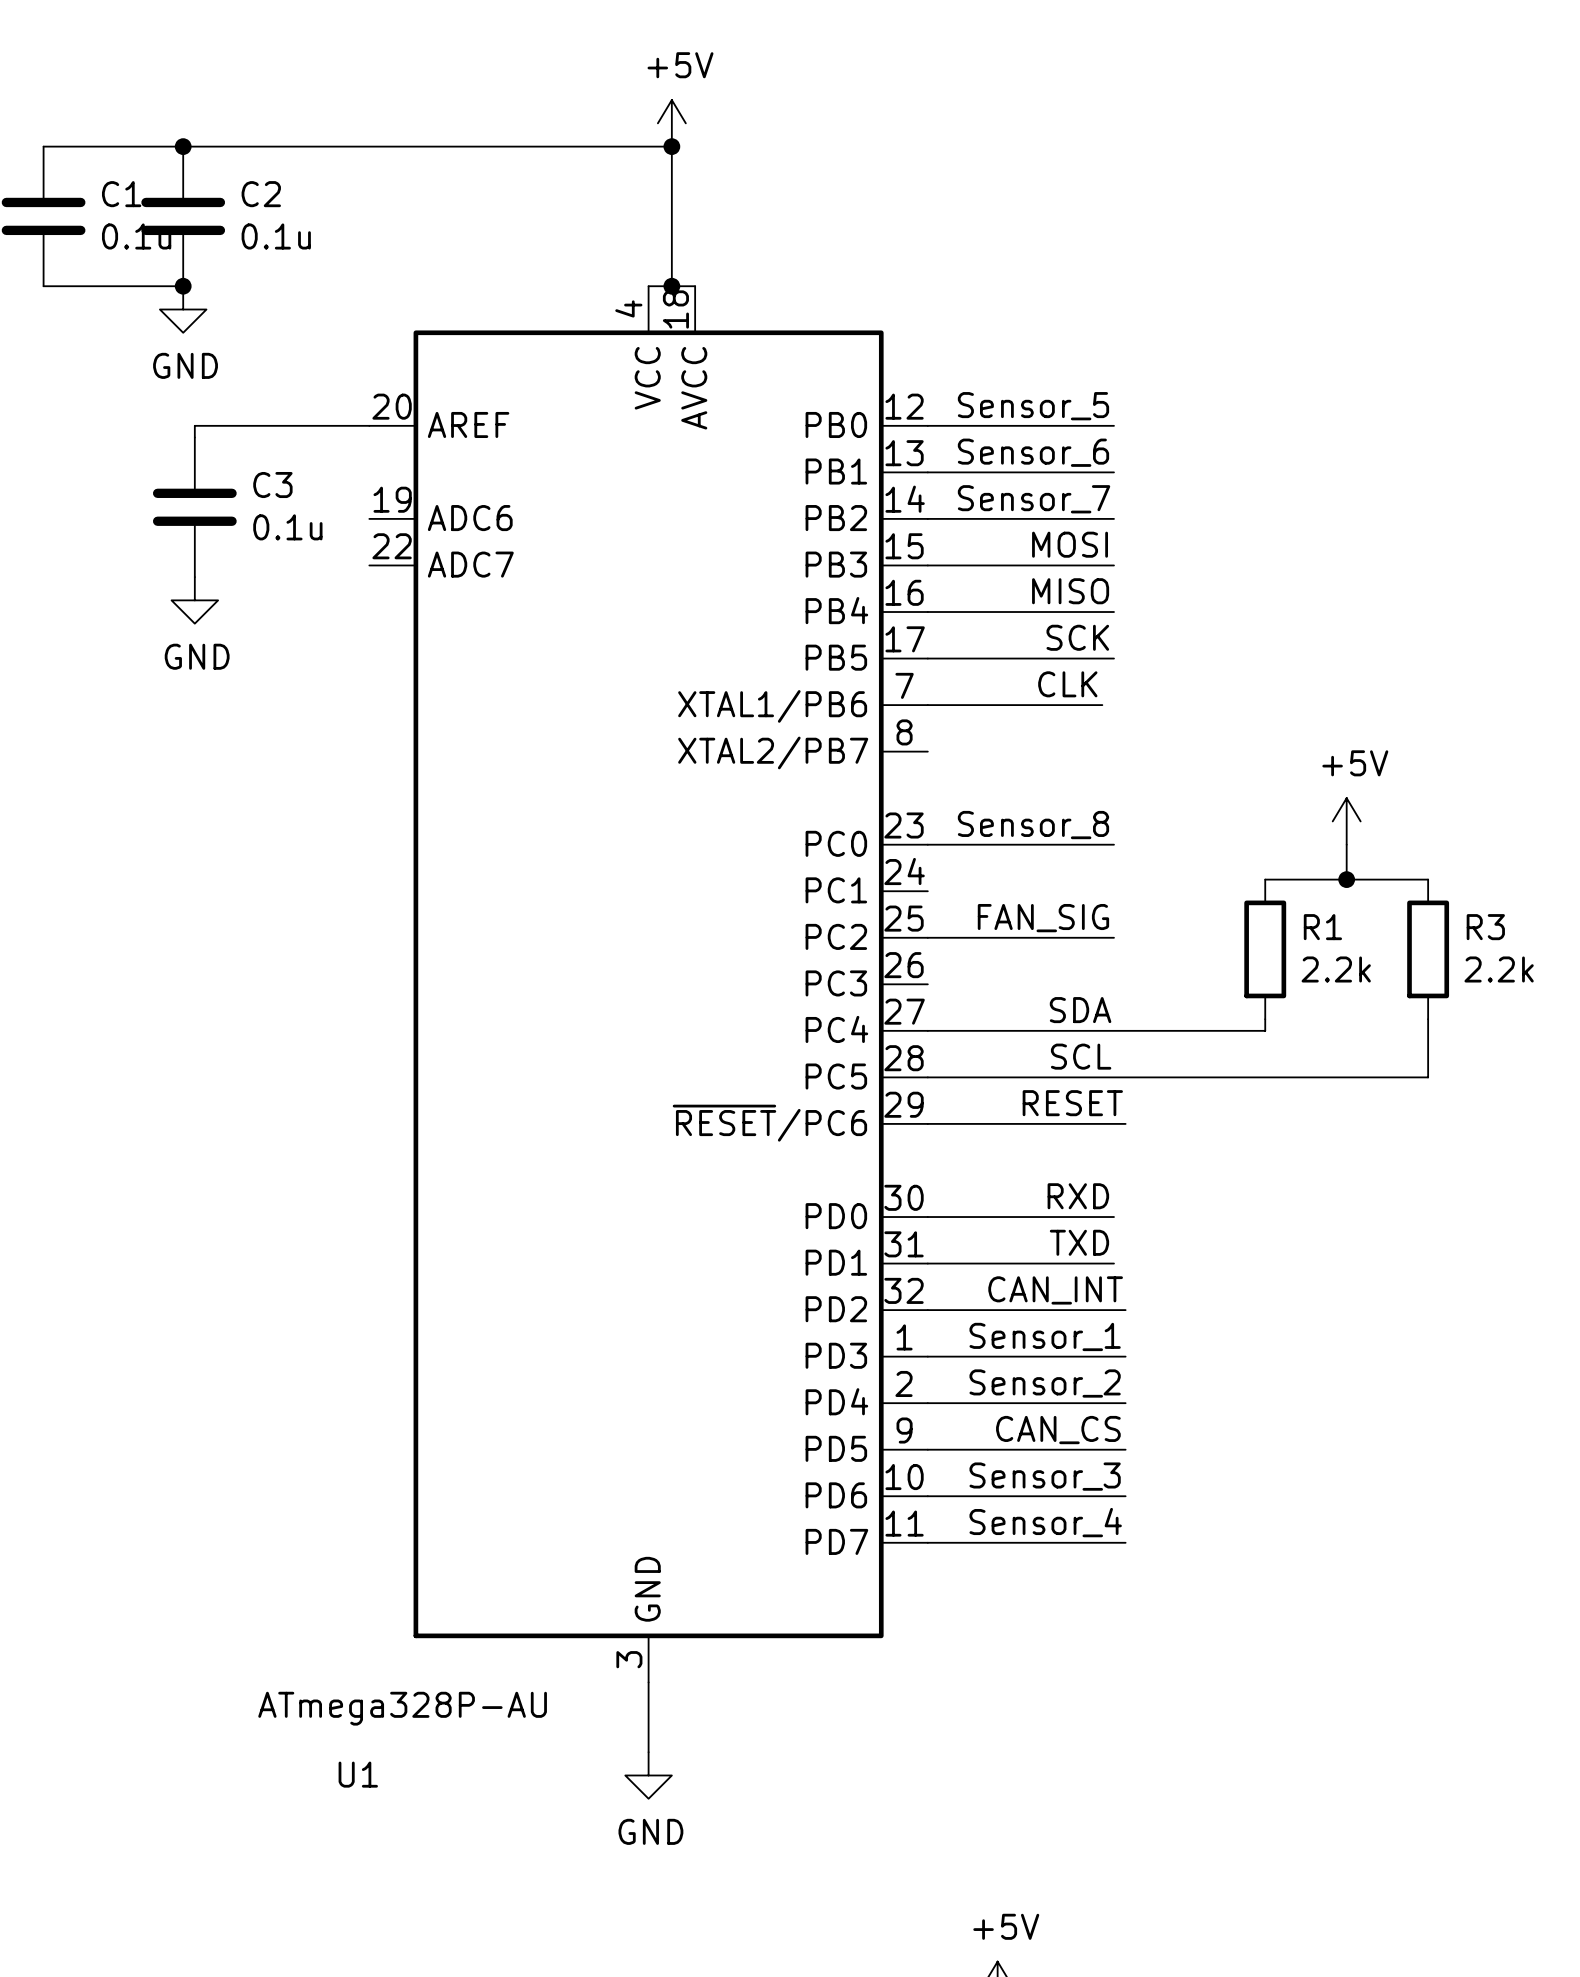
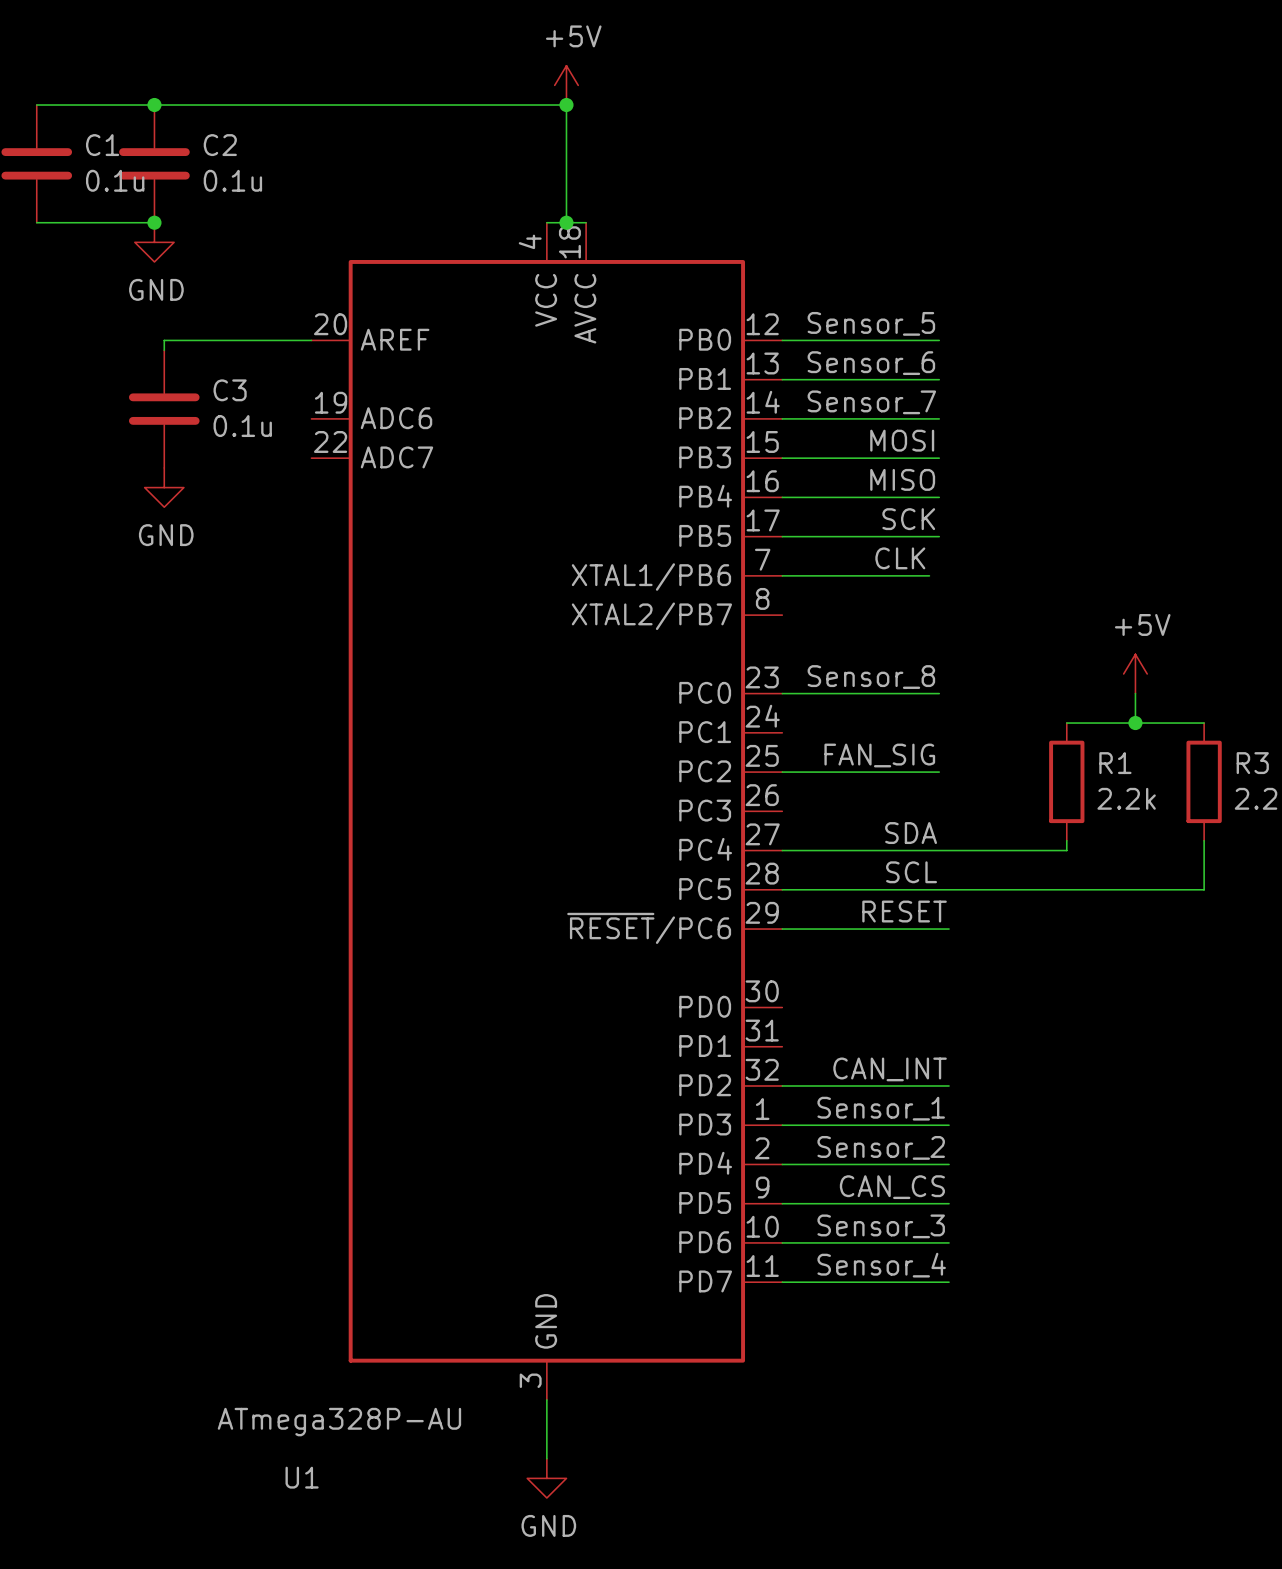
label: RXD (1078, 1196) -> none
wire: (927, 1217) (1113, 1217) -> none
label: TXD (1079, 1242) -> none
wire: (927, 1263) (1113, 1263) -> none

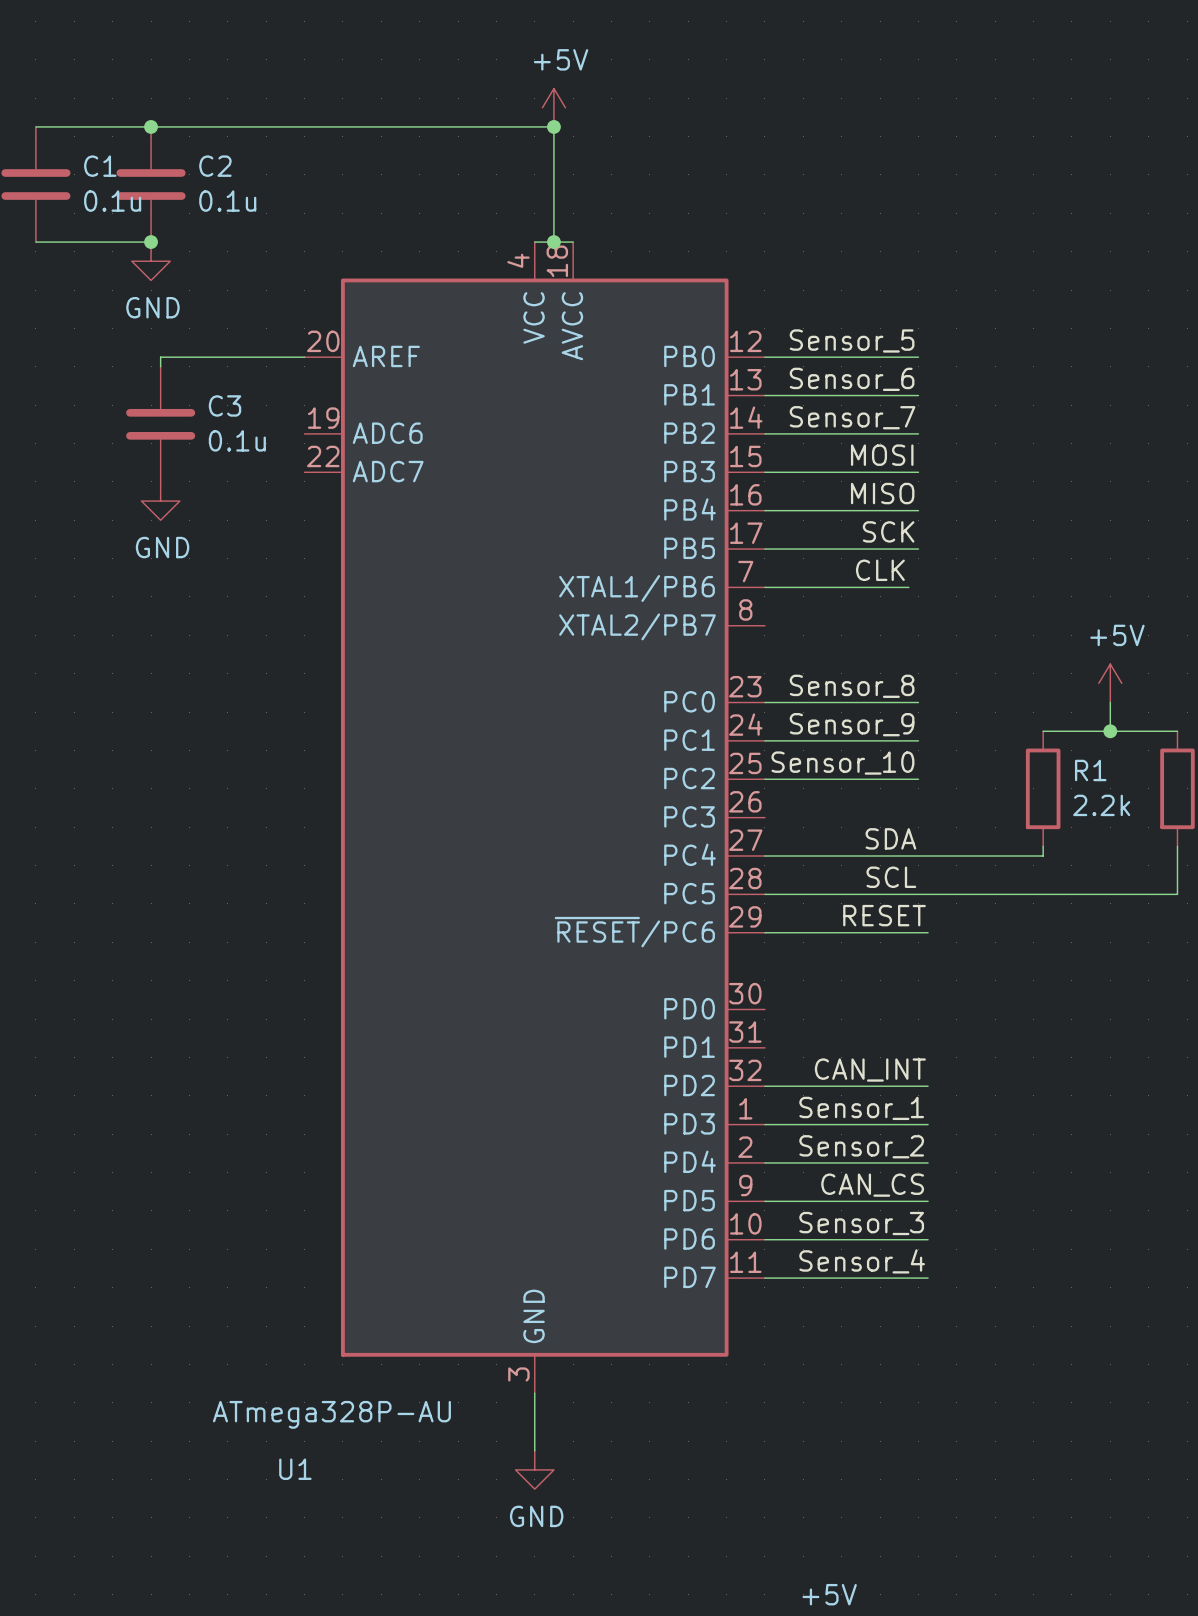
label: none -> Sensor_9 (852, 724)
wire: none -> (764, 740) (918, 740)
label: FAN_SIG (879, 755) -> Sensor_10 (842, 763)

